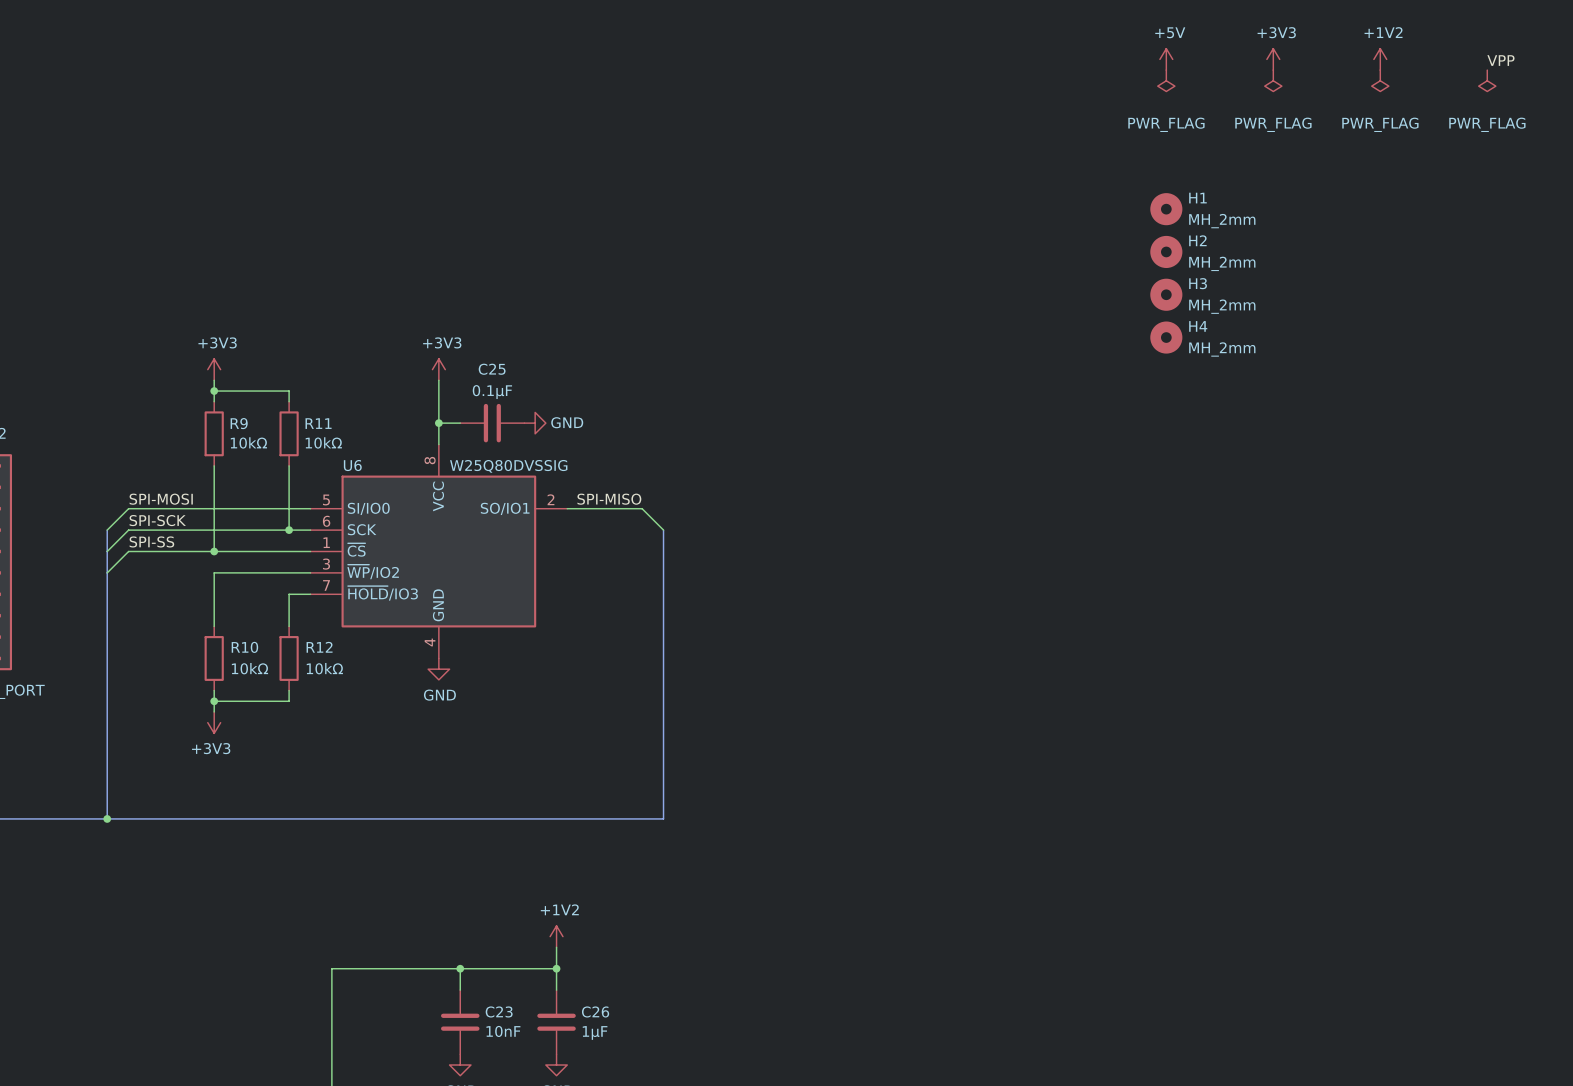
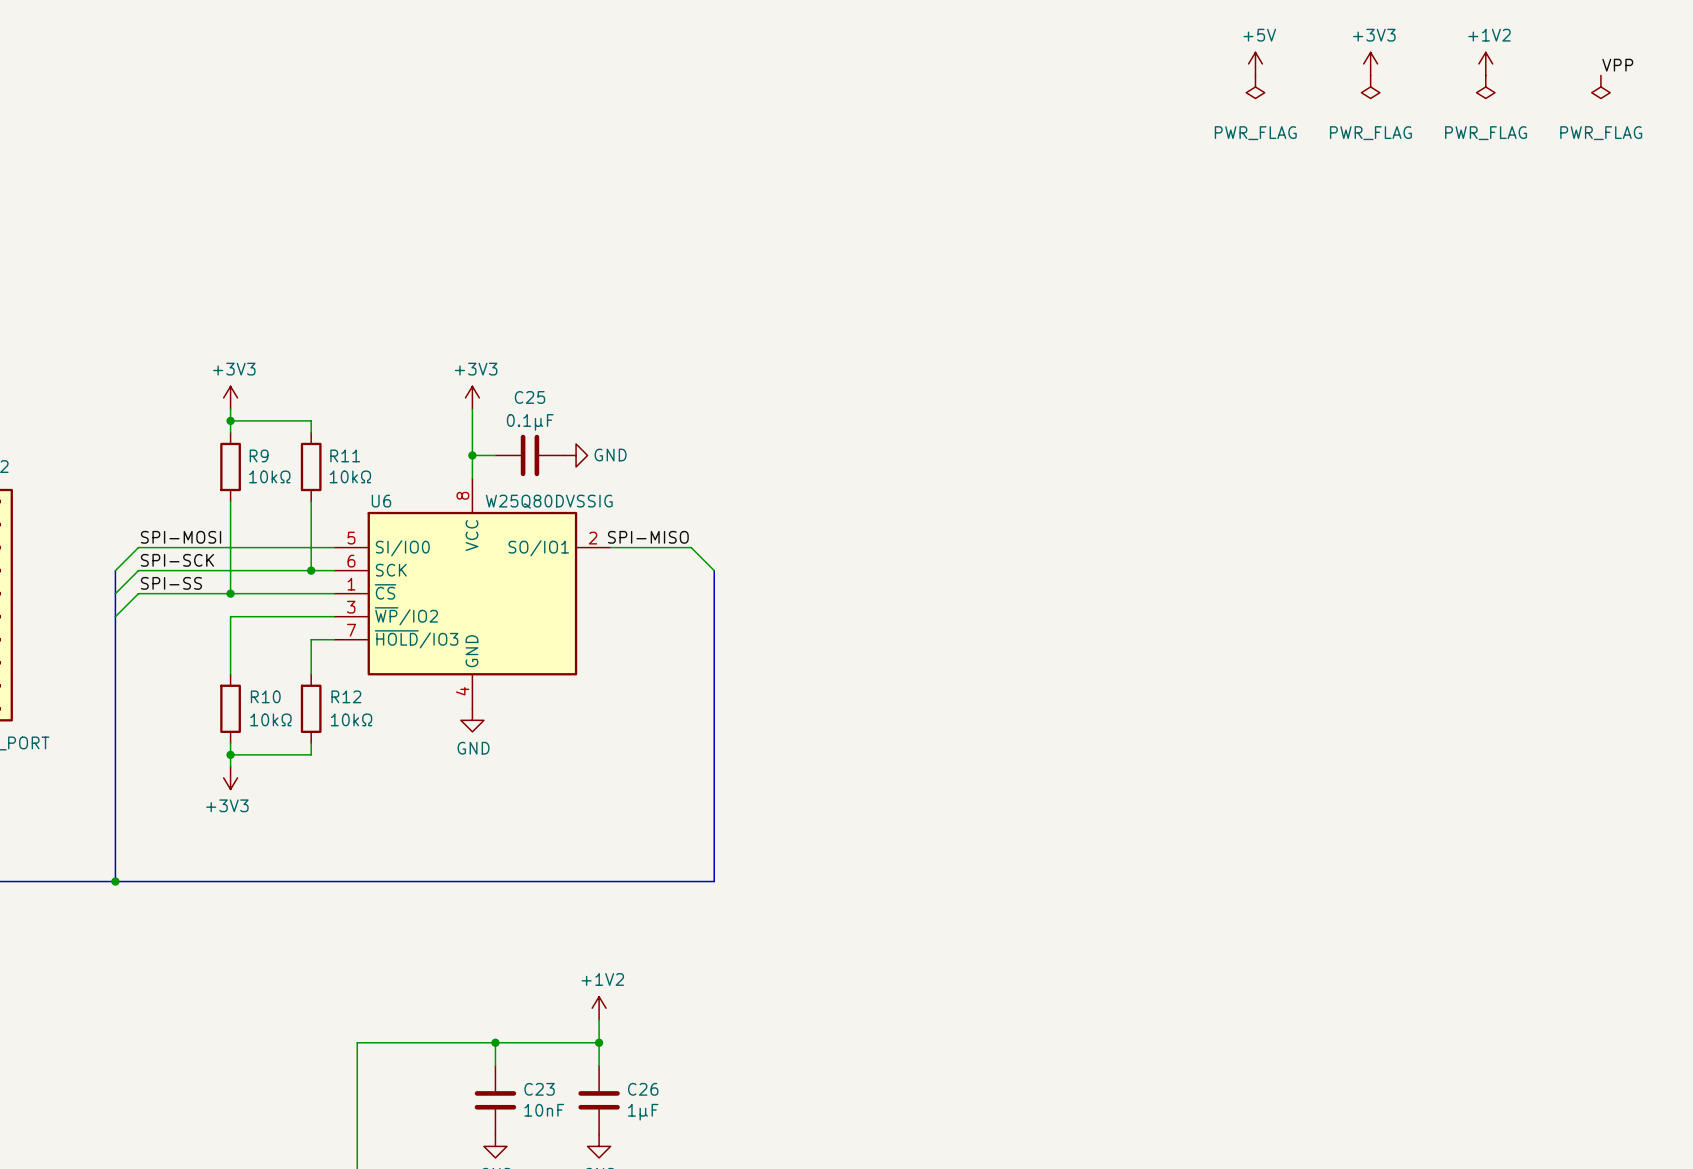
H1: MH_2mm (1166, 209) -> none
H2: MH_2mm (1166, 251) -> none
H3: MH_2mm (1166, 294) -> none
H4: MH_2mm (1166, 337) -> none

